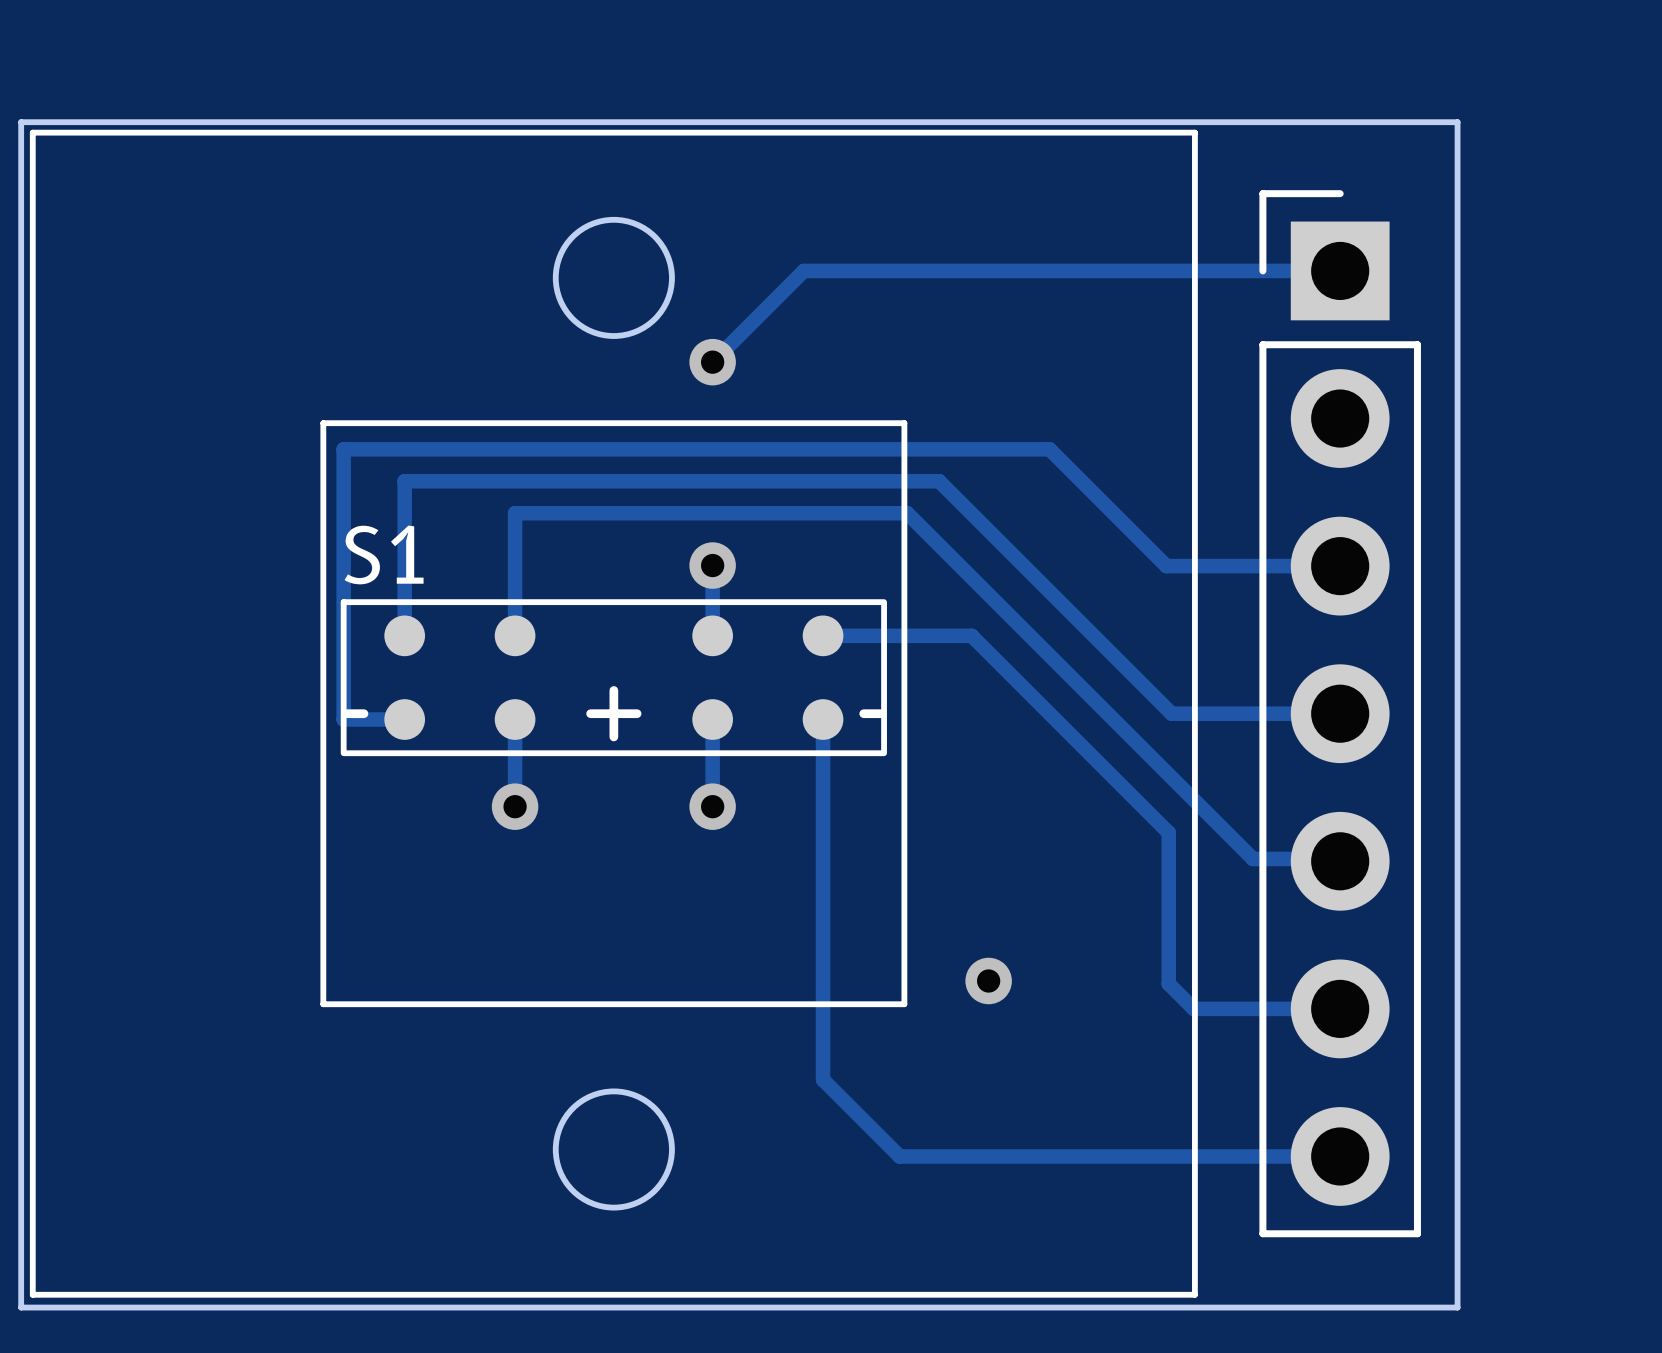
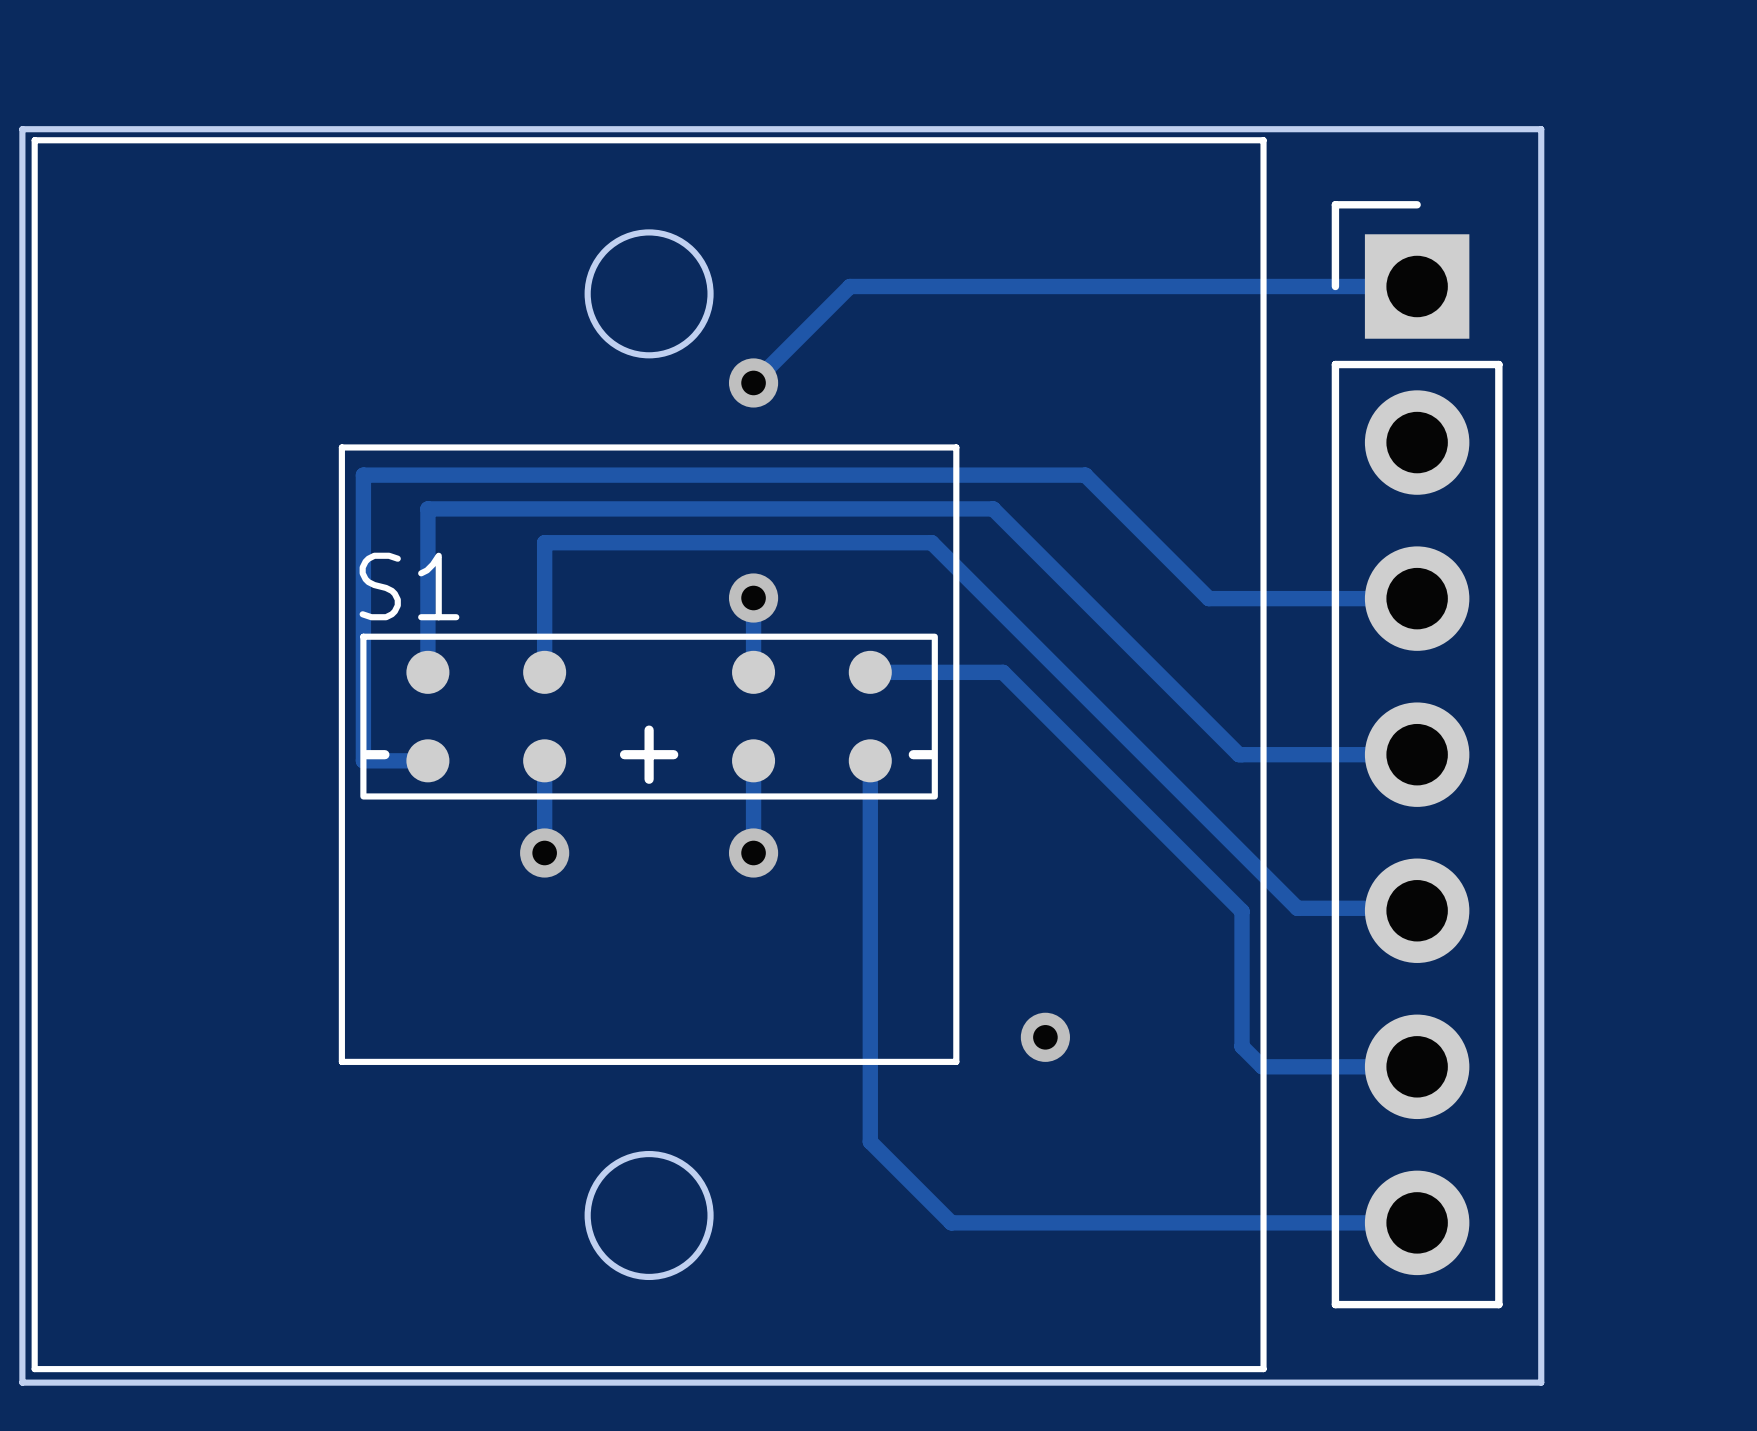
track: (1026, 449) (1049, 449) (1166, 566) -> (1085, 475) (1208, 598) (1233, 598)
track: (881, 513) (907, 513) (1253, 858) -> (931, 542) (1297, 908) (1324, 908)
track: (948, 635) (971, 635) (1168, 832) (1168, 983) (1174, 989) -> (1003, 672) (1242, 911) (1242, 1046)

